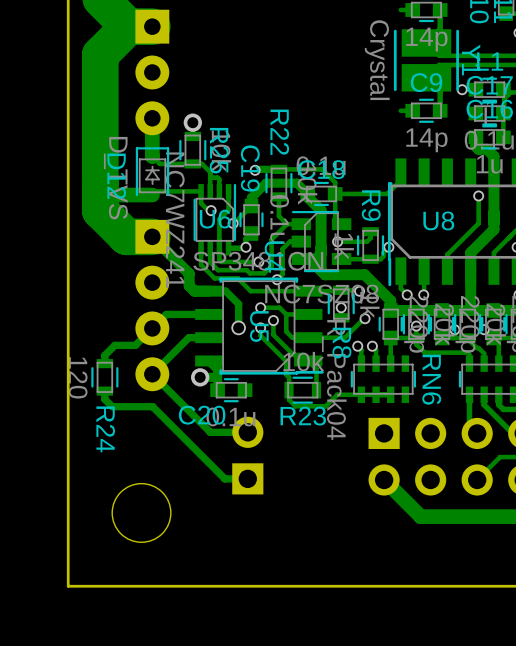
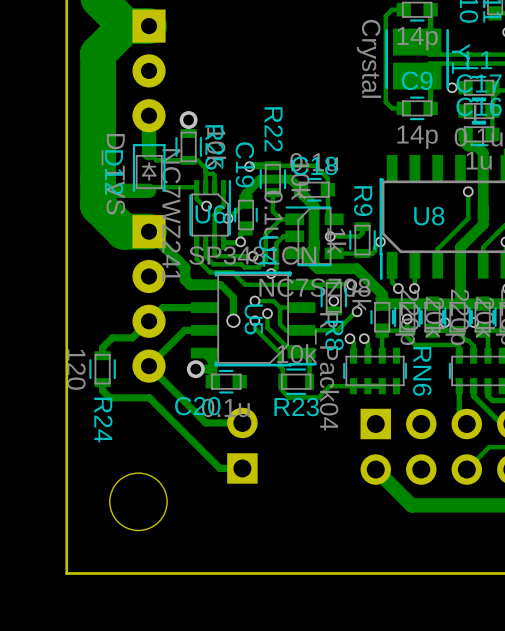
track: none -> (392, 9) (385, 16) (385, 102) (392, 108)
track: (400, 172) (400, 180) (387, 193) (335, 193) -> none

